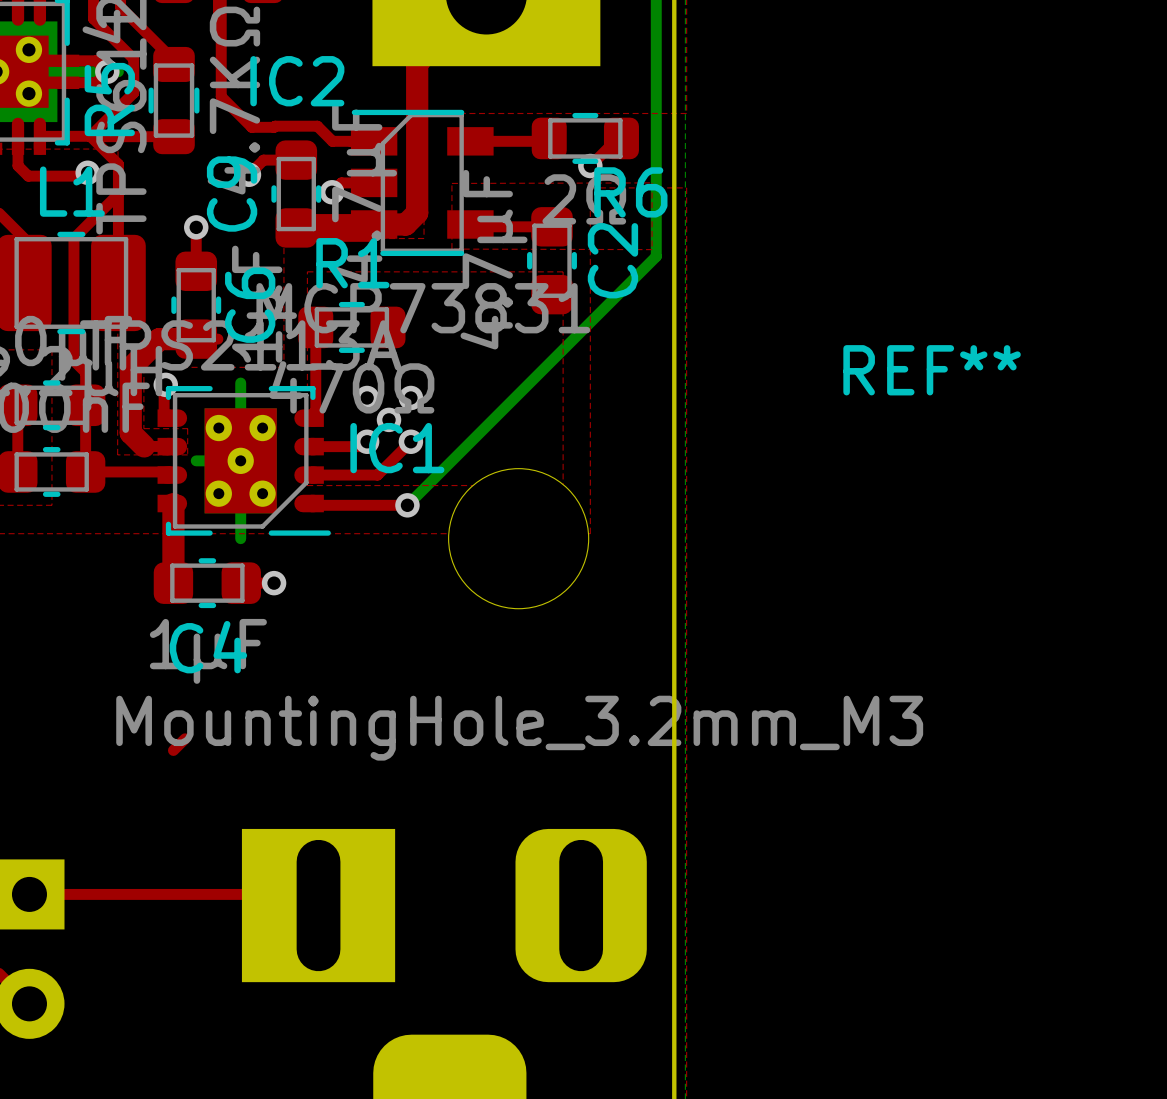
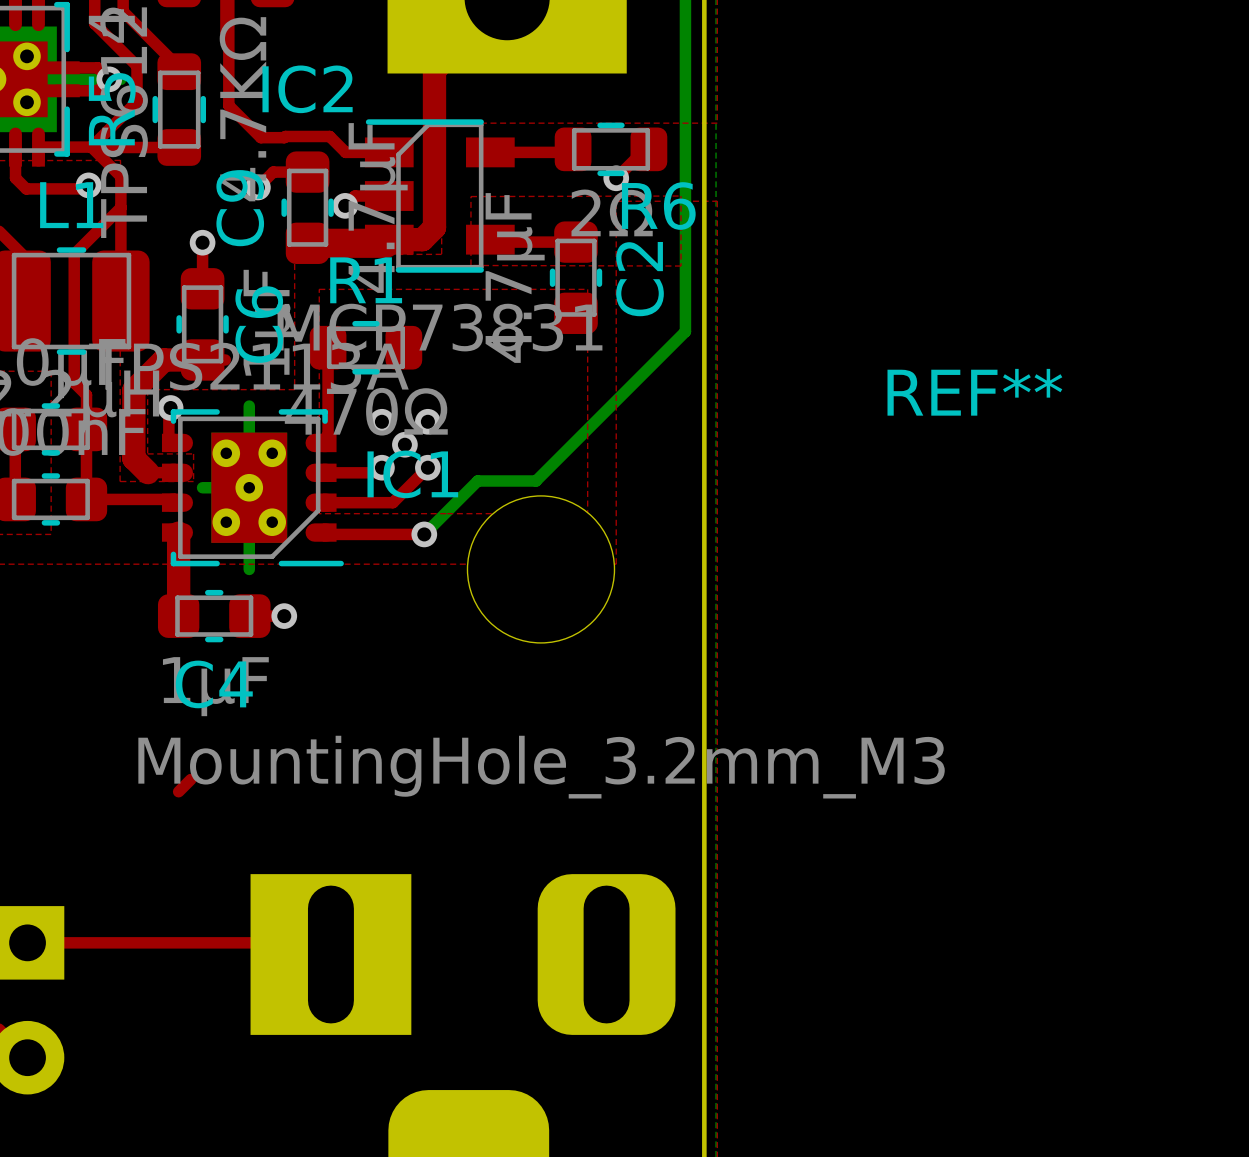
bottom track: (656, 256) (458, 454) -> (685, 273) (685, 331) (536, 481) (477, 481)

